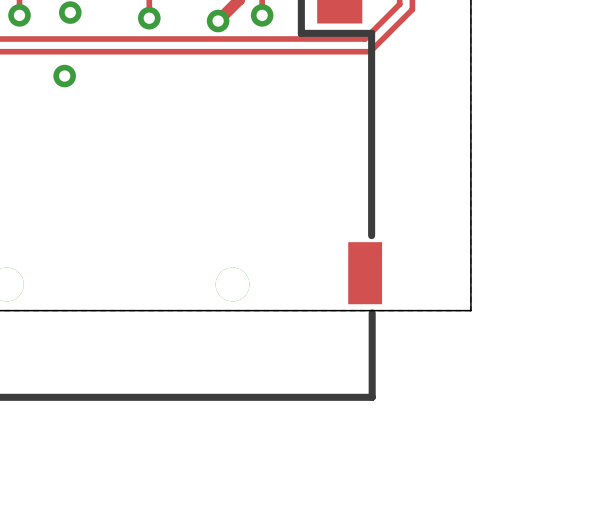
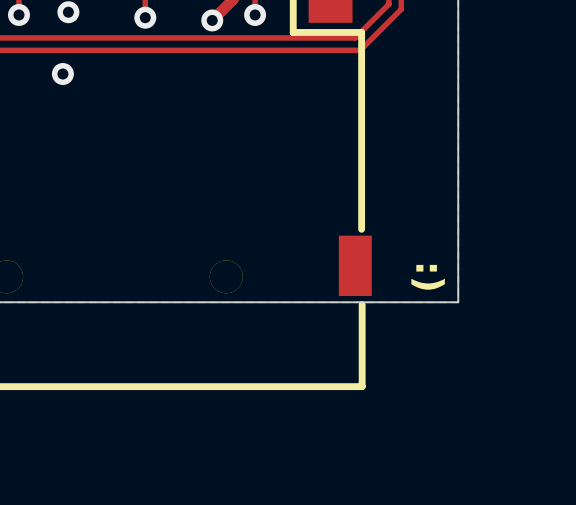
text: none -> :) (428, 277)

